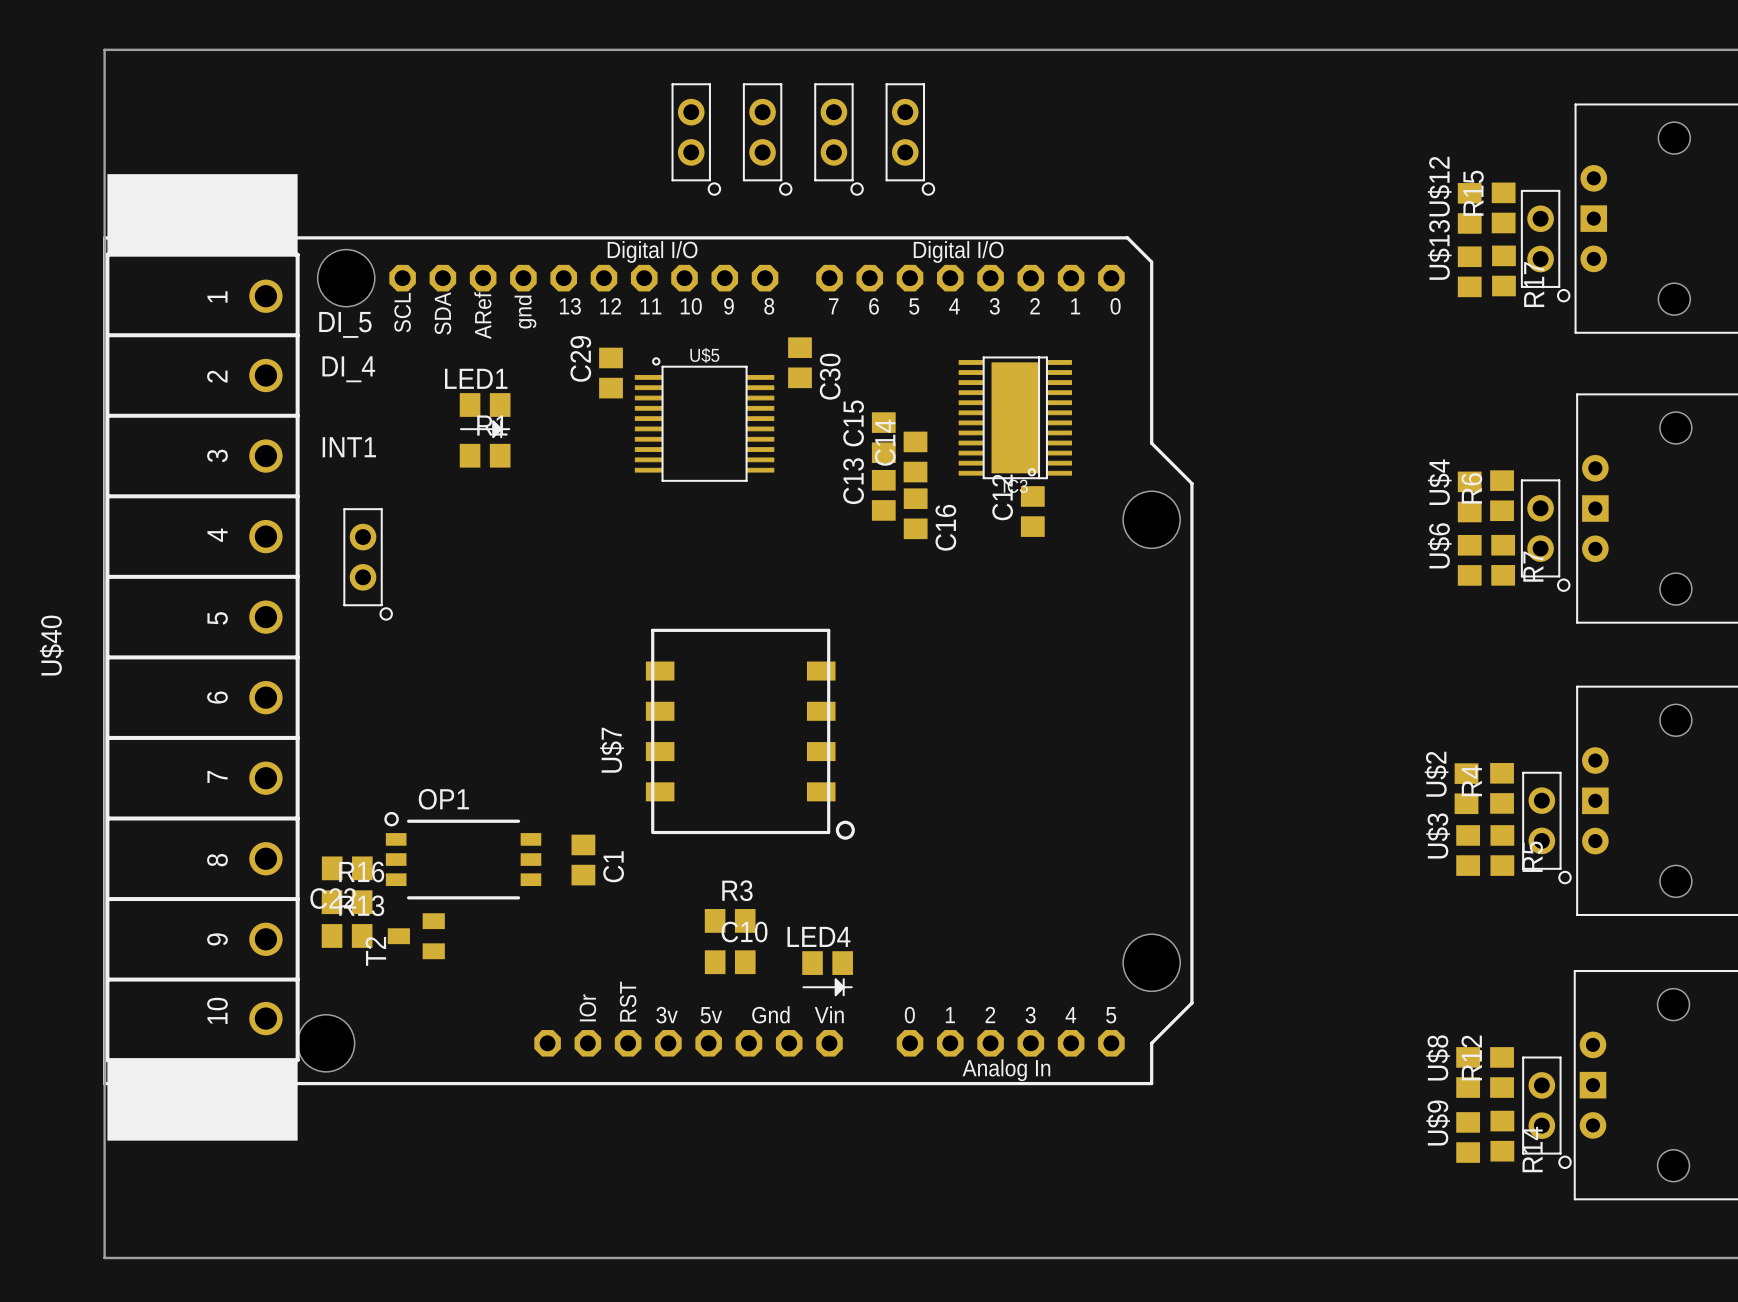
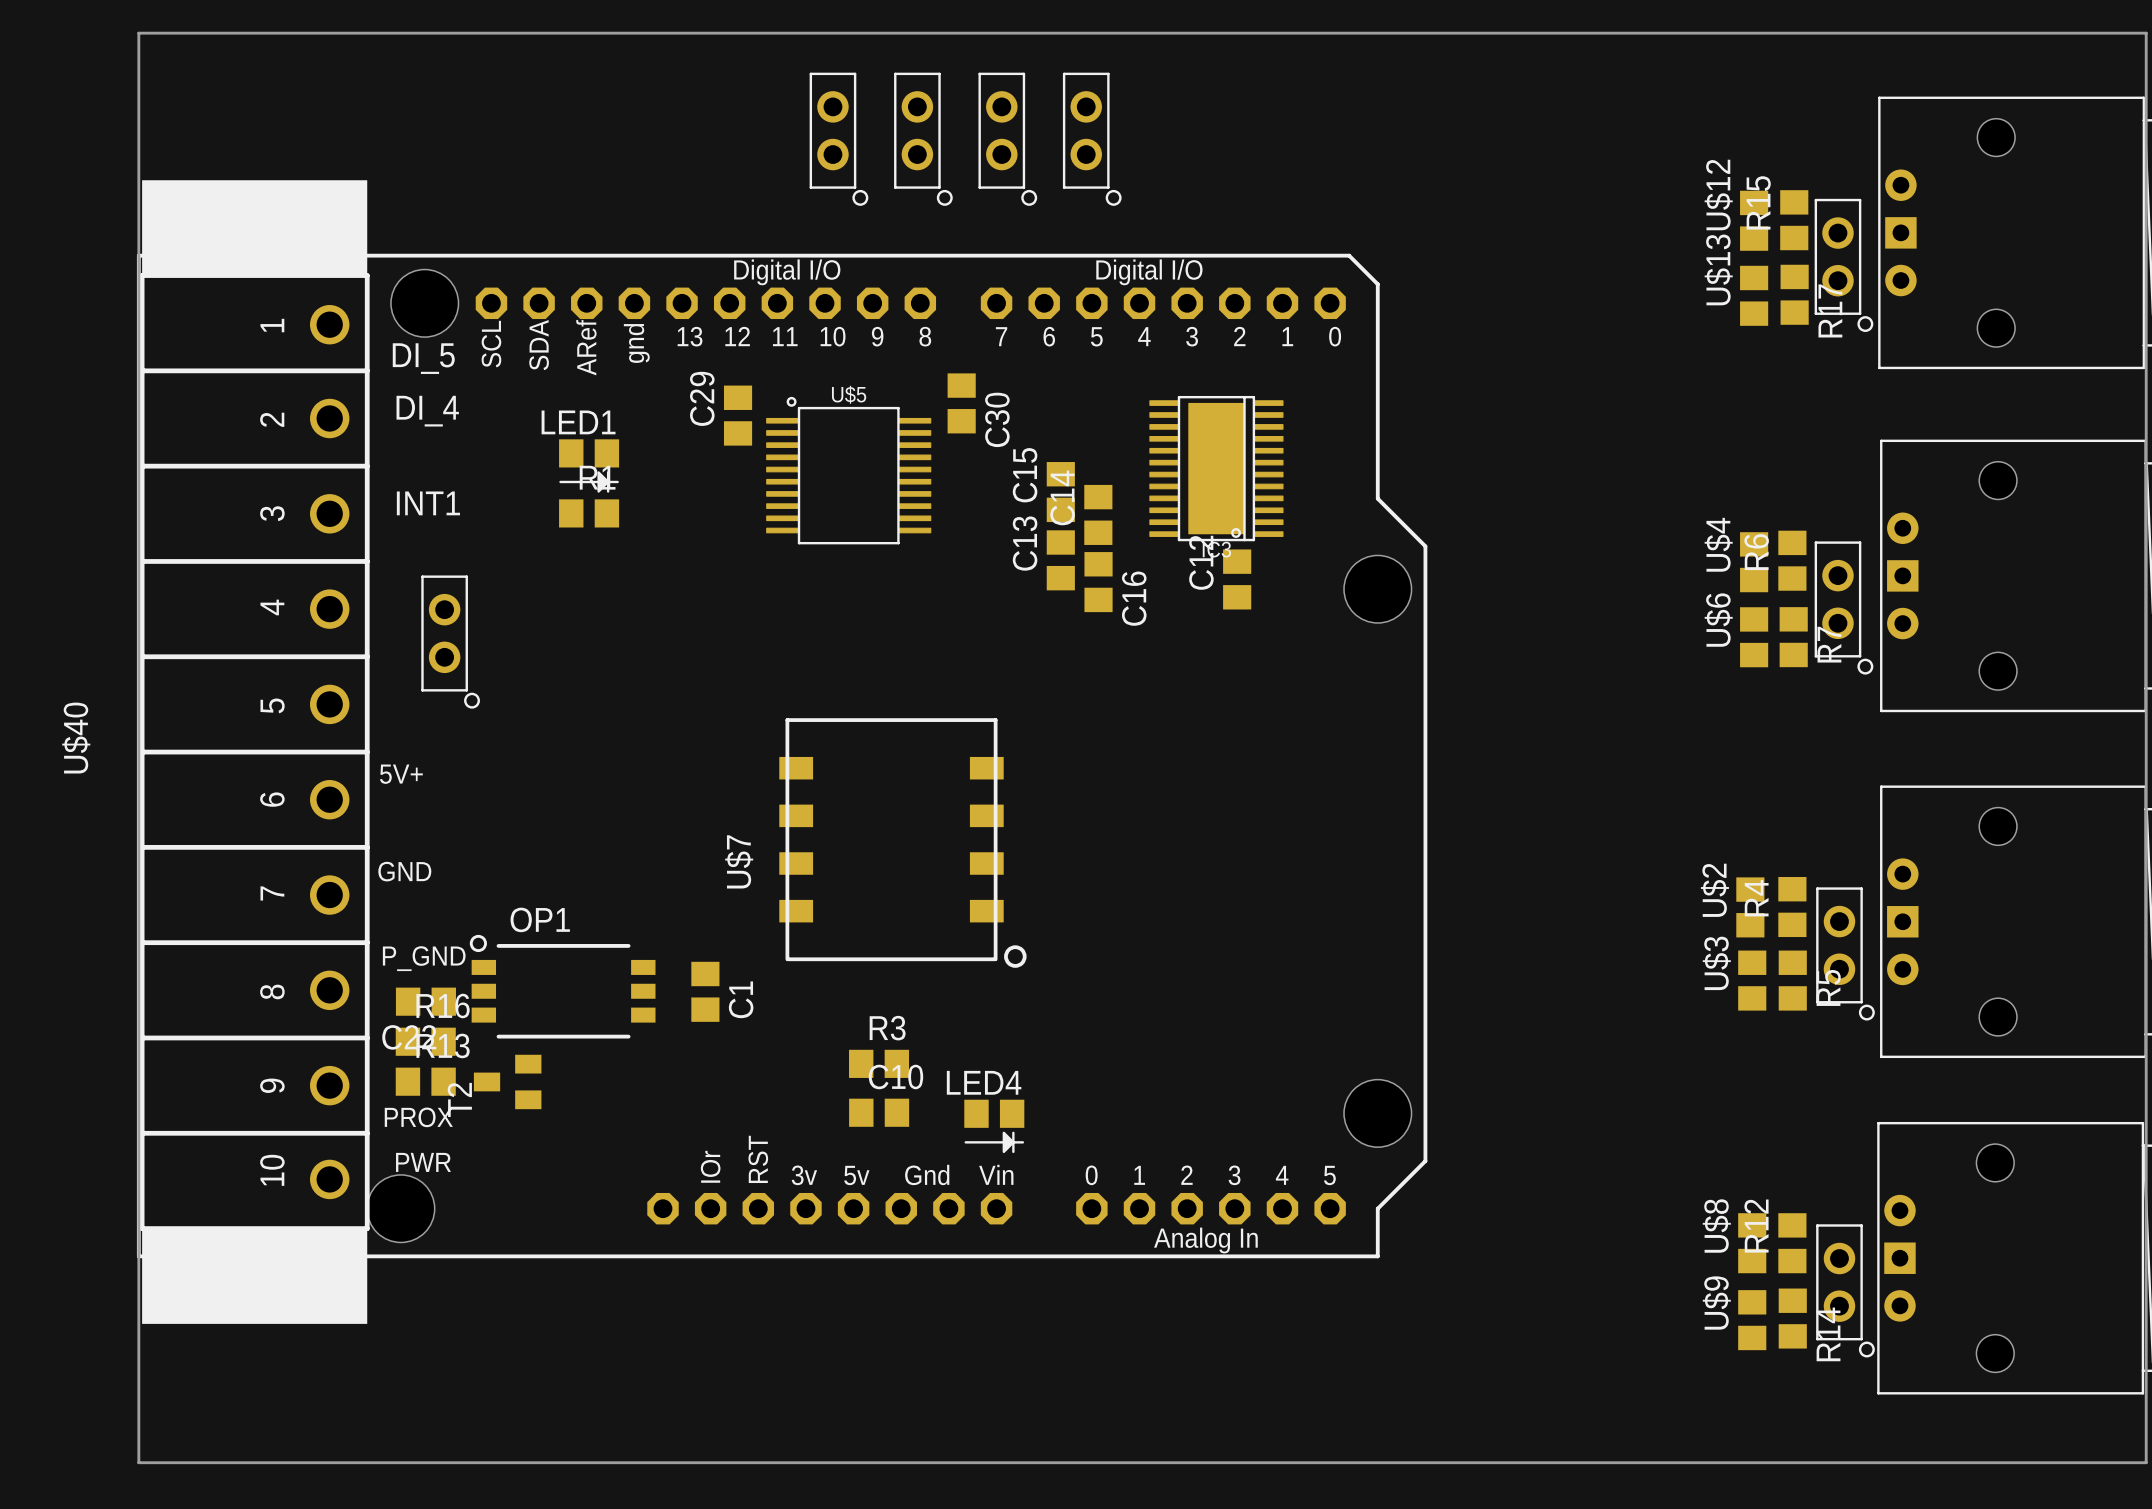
text: none -> 5V+ (401, 774)
text: none -> GND (404, 871)
text: none -> P_GND (424, 958)
text: none -> PROX (418, 1117)
text: none -> PWR (423, 1162)

